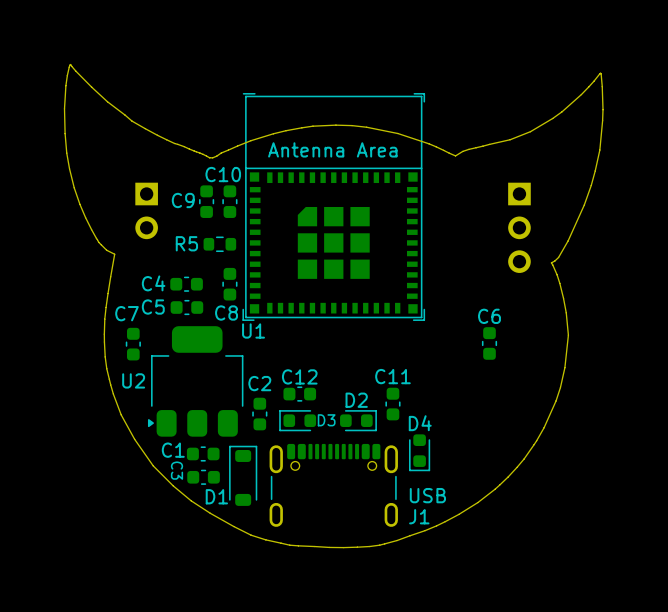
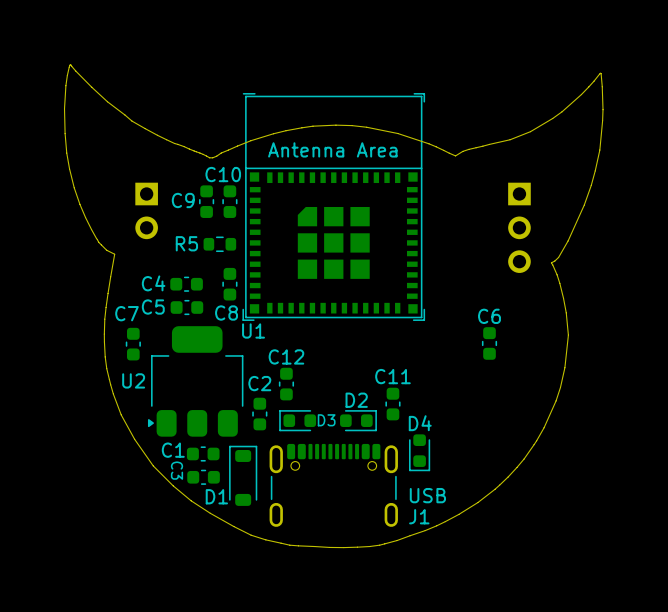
C12 rotation: 0° (299, 394) -> 90° clockwise (286, 384)

